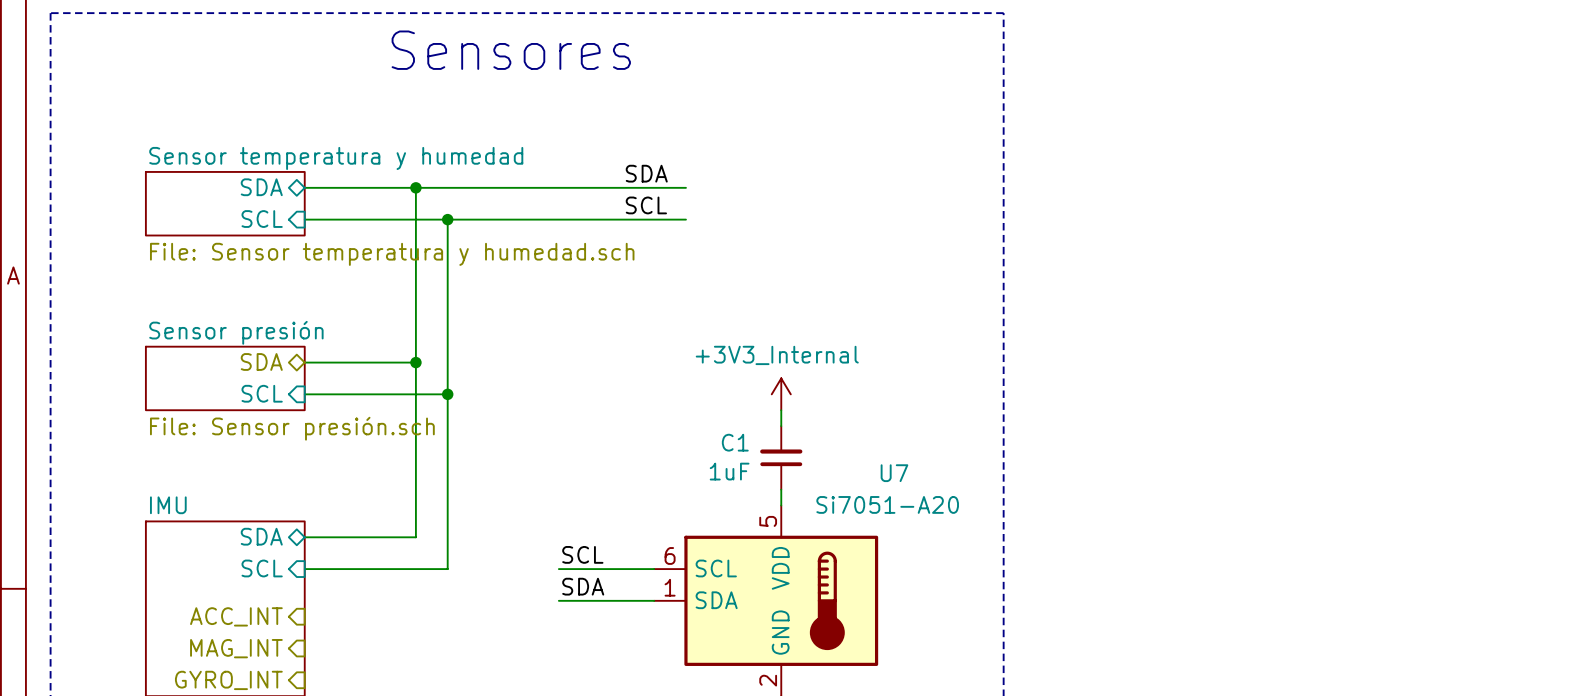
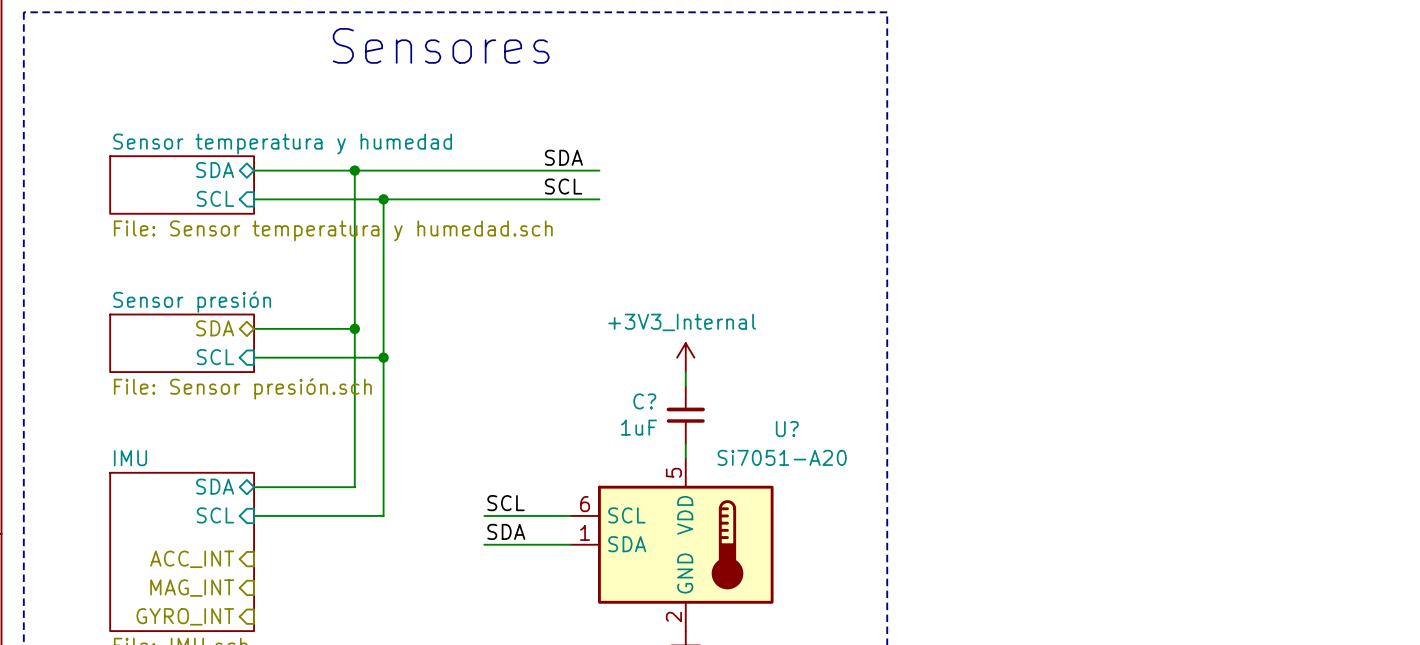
C1 name: C1 (735, 442) -> C? (644, 401)
U7 name: U7 (894, 473) -> U? (787, 429)

